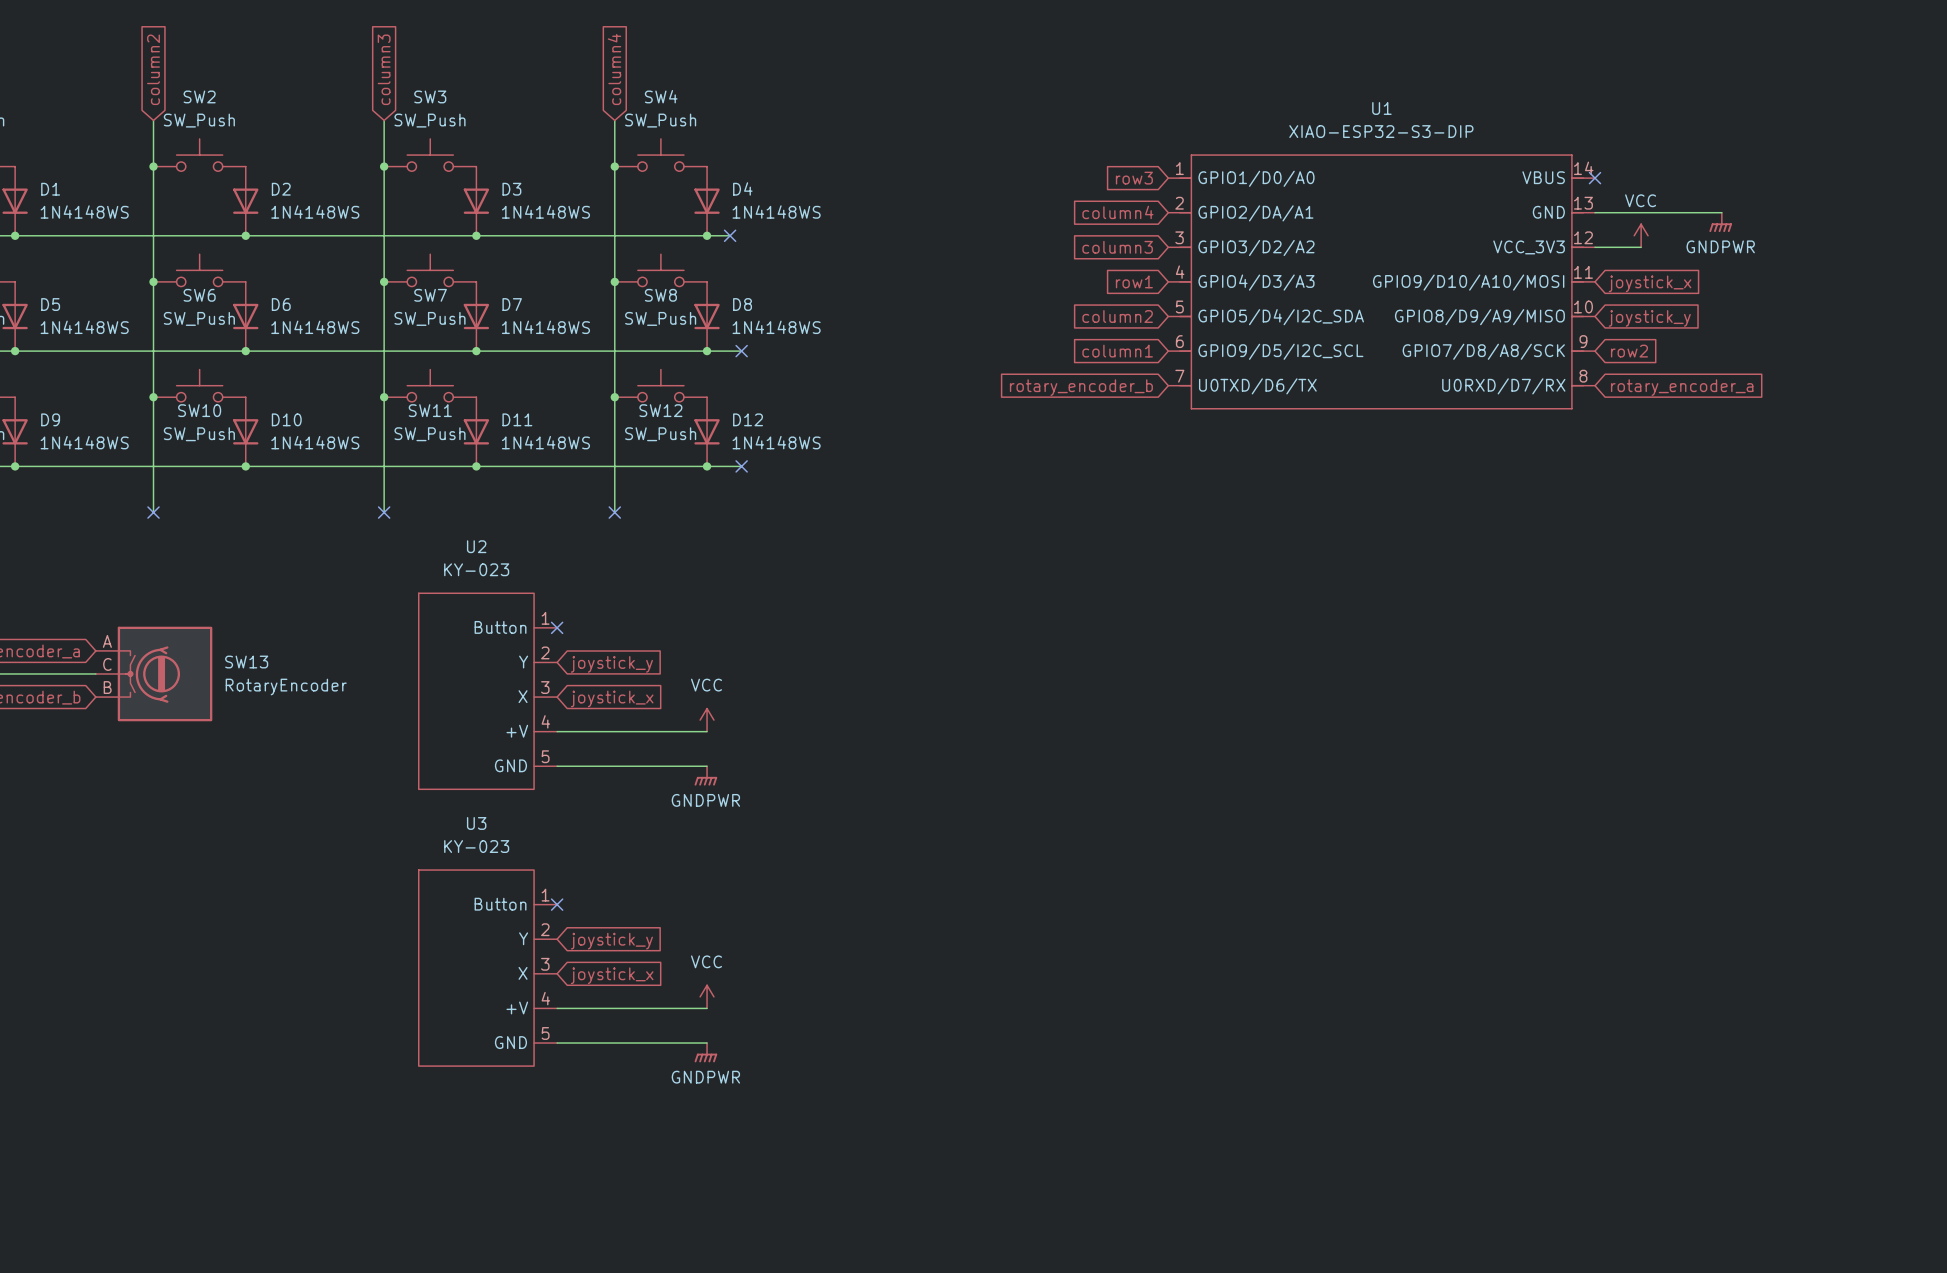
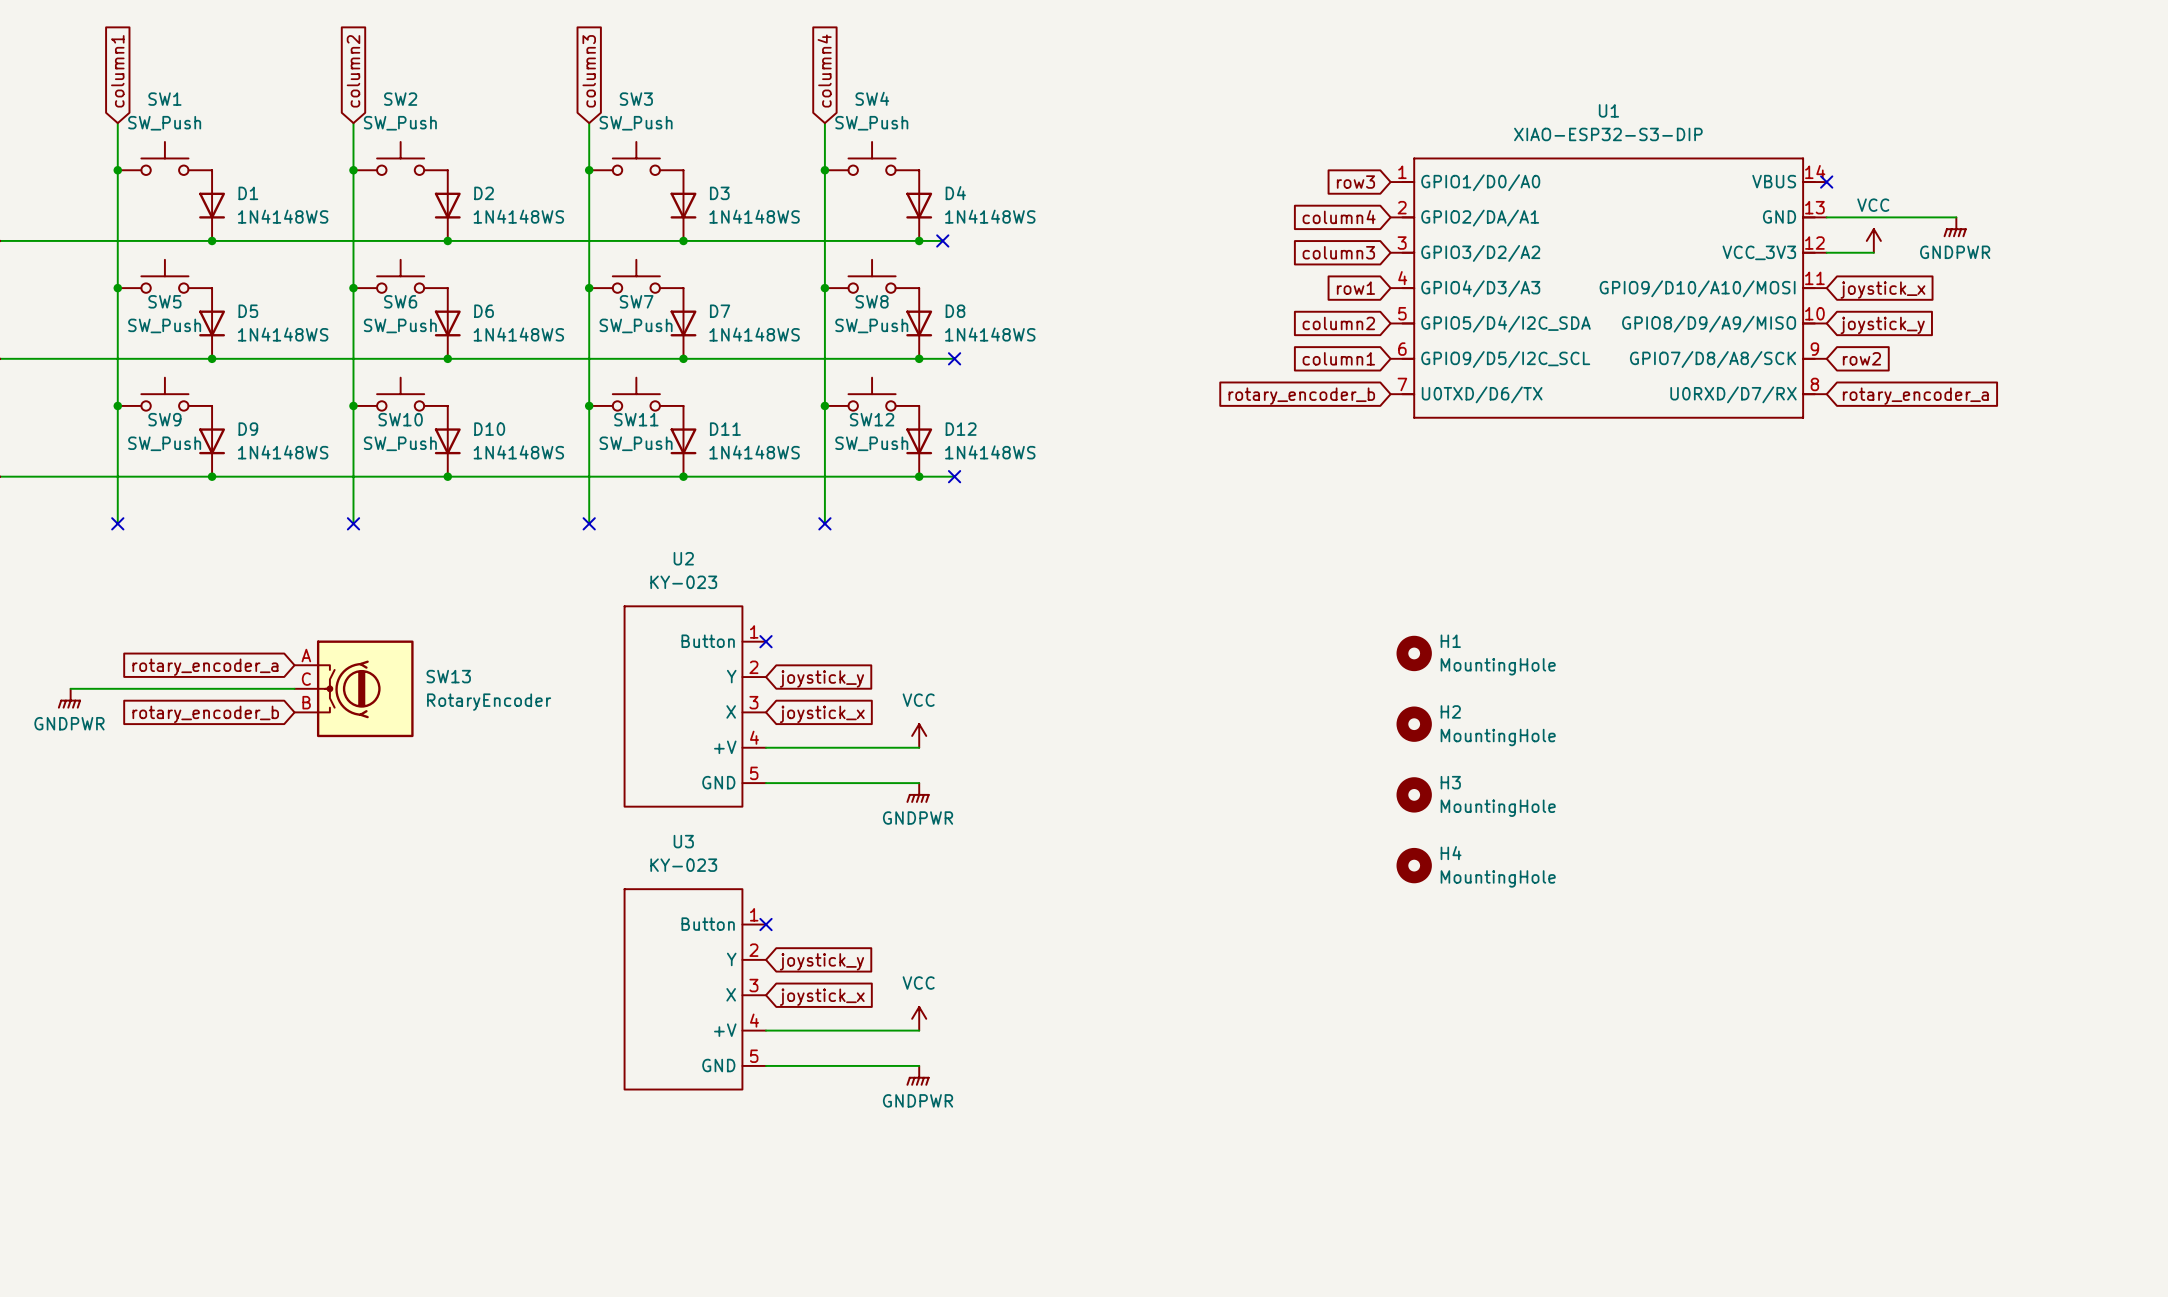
H1: none -> MountingHole (1414, 653)
H2: none -> MountingHole (1414, 724)
H3: none -> MountingHole (1414, 794)
H4: none -> MountingHole (1414, 865)

